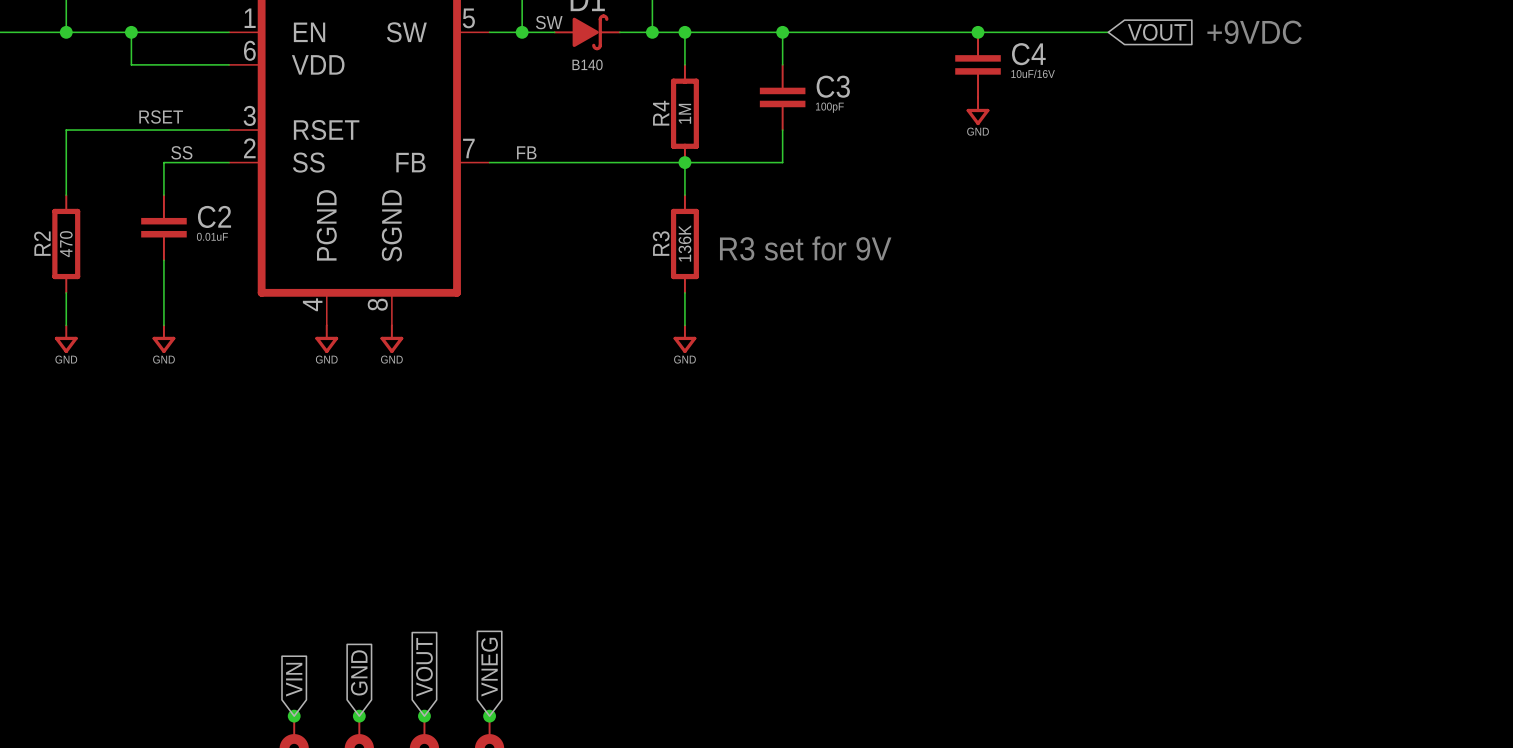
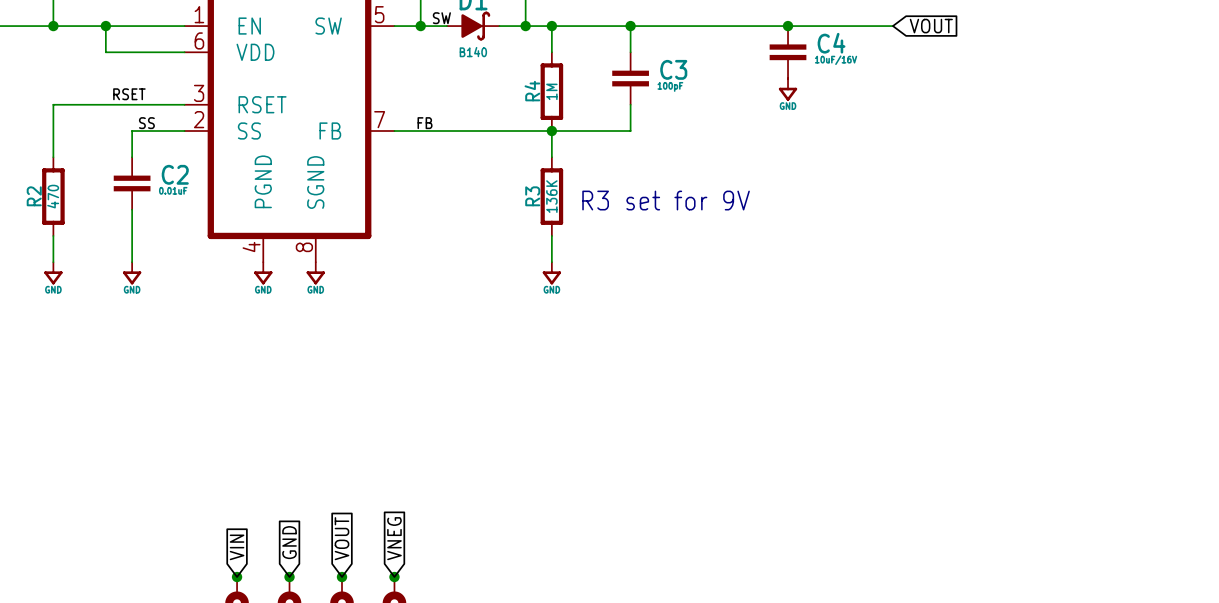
text: +9VDC (1254, 32) -> none

